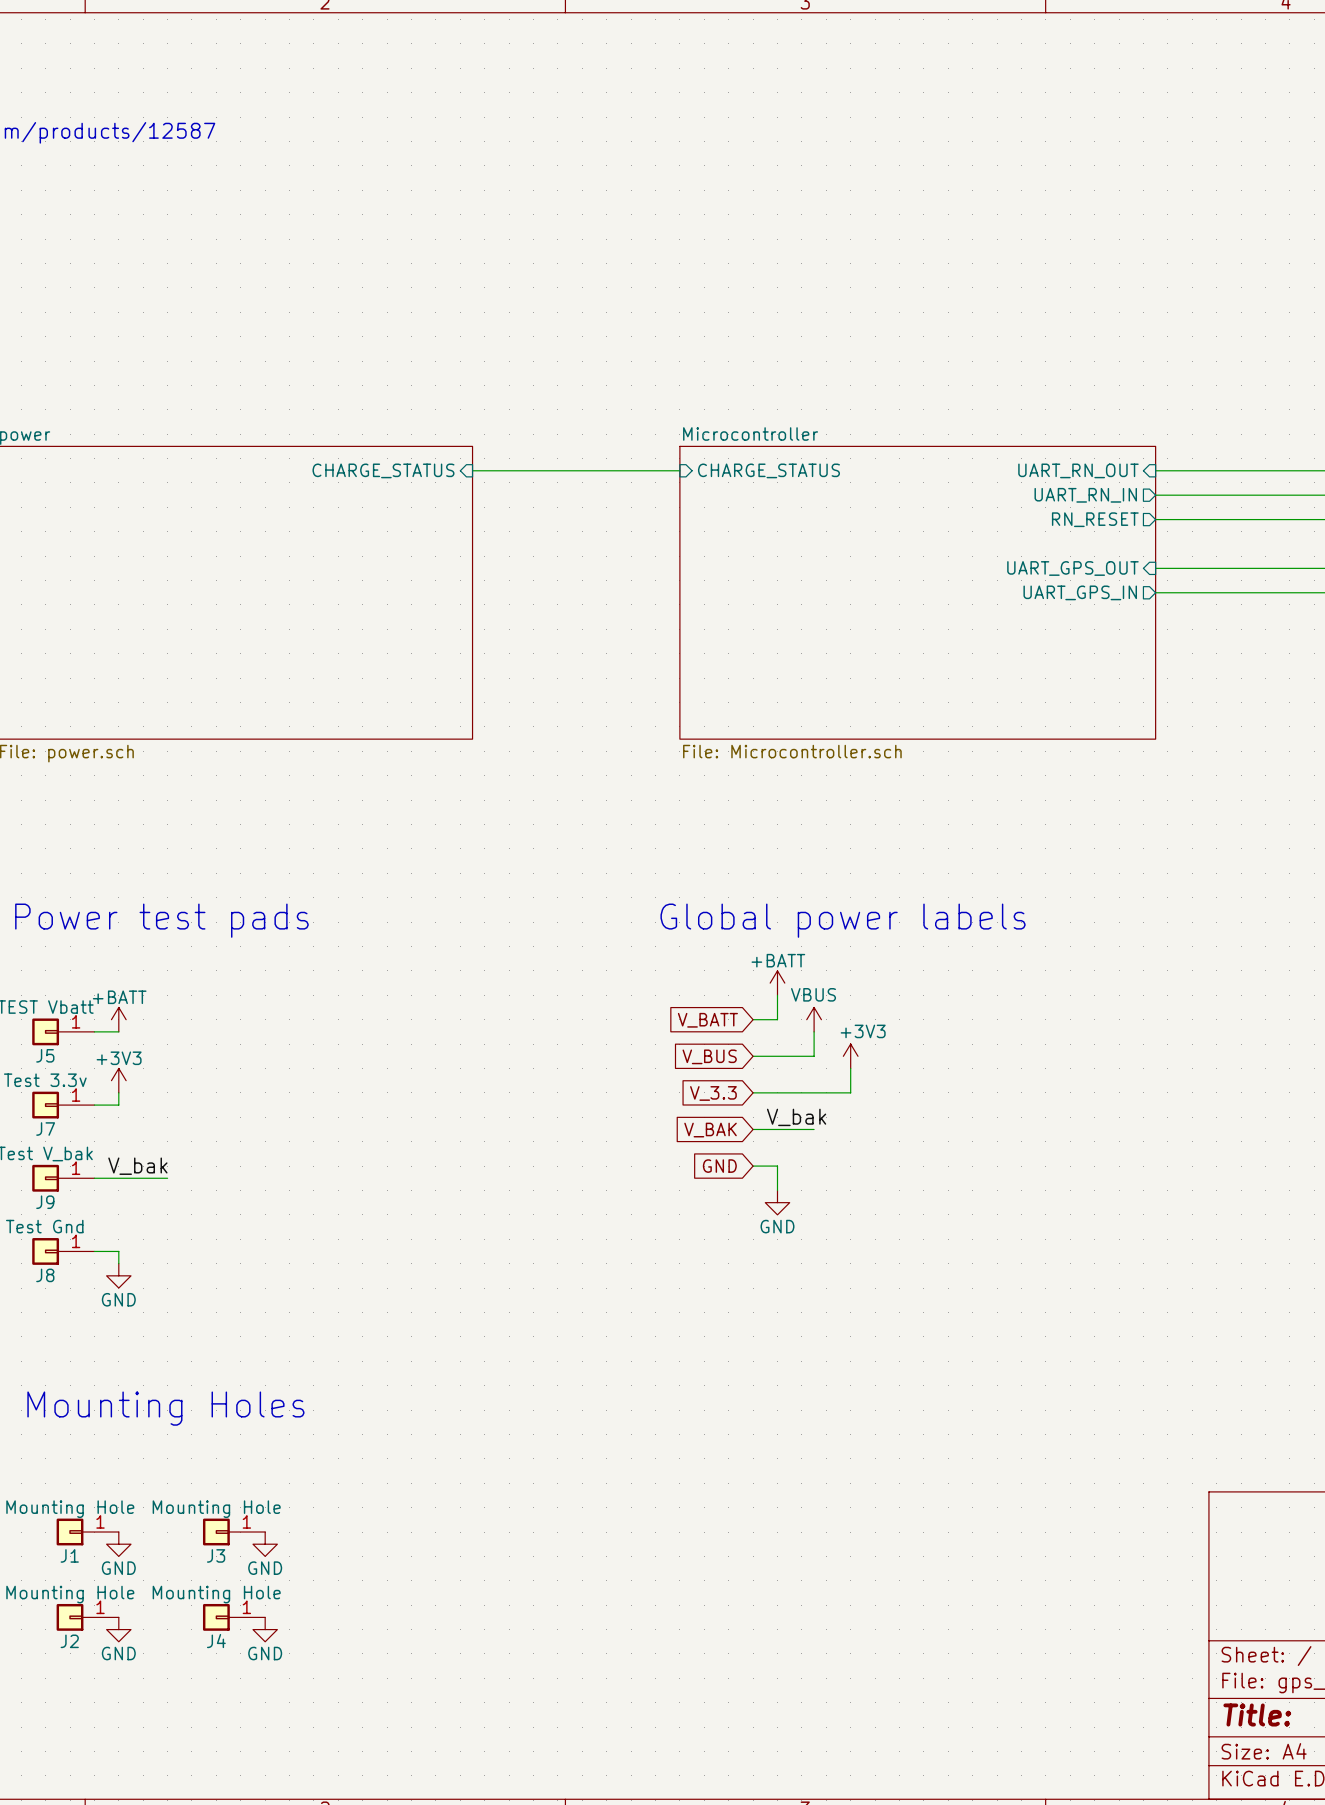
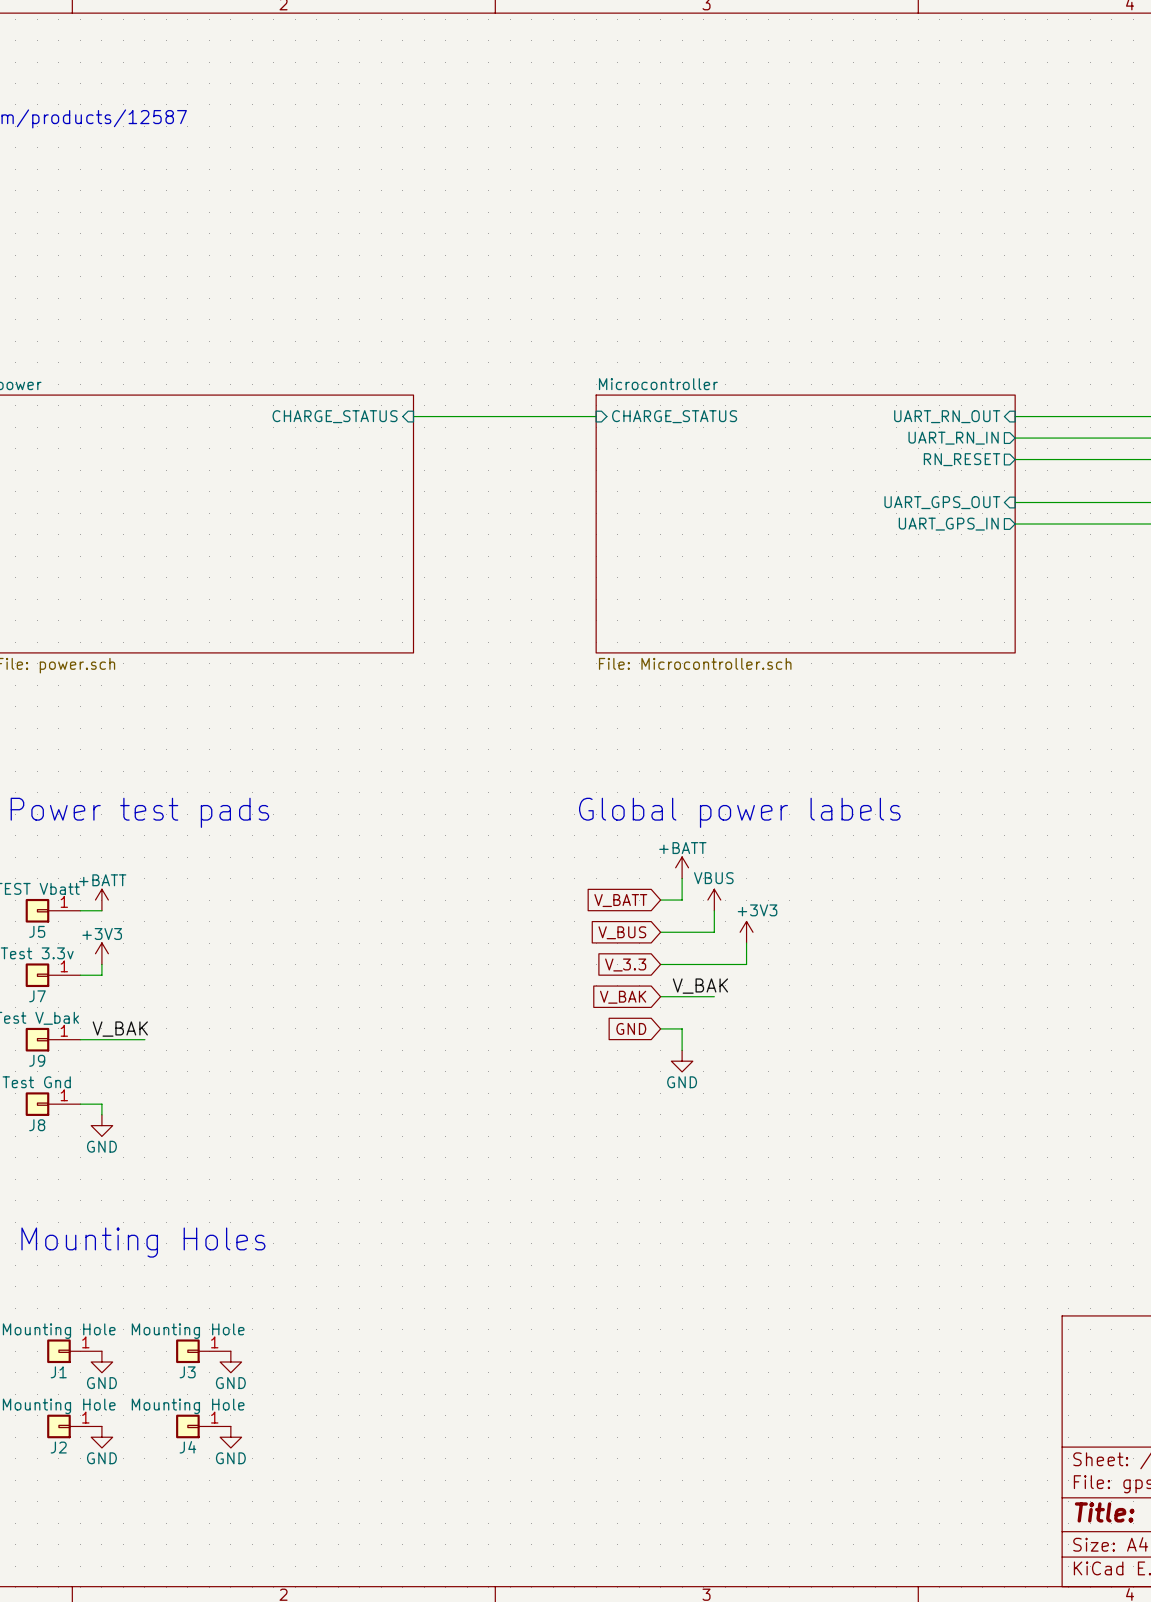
label: V_bak (796, 1117) -> V_BAK (700, 986)
label: V_bak (137, 1166) -> V_BAK (120, 1029)

